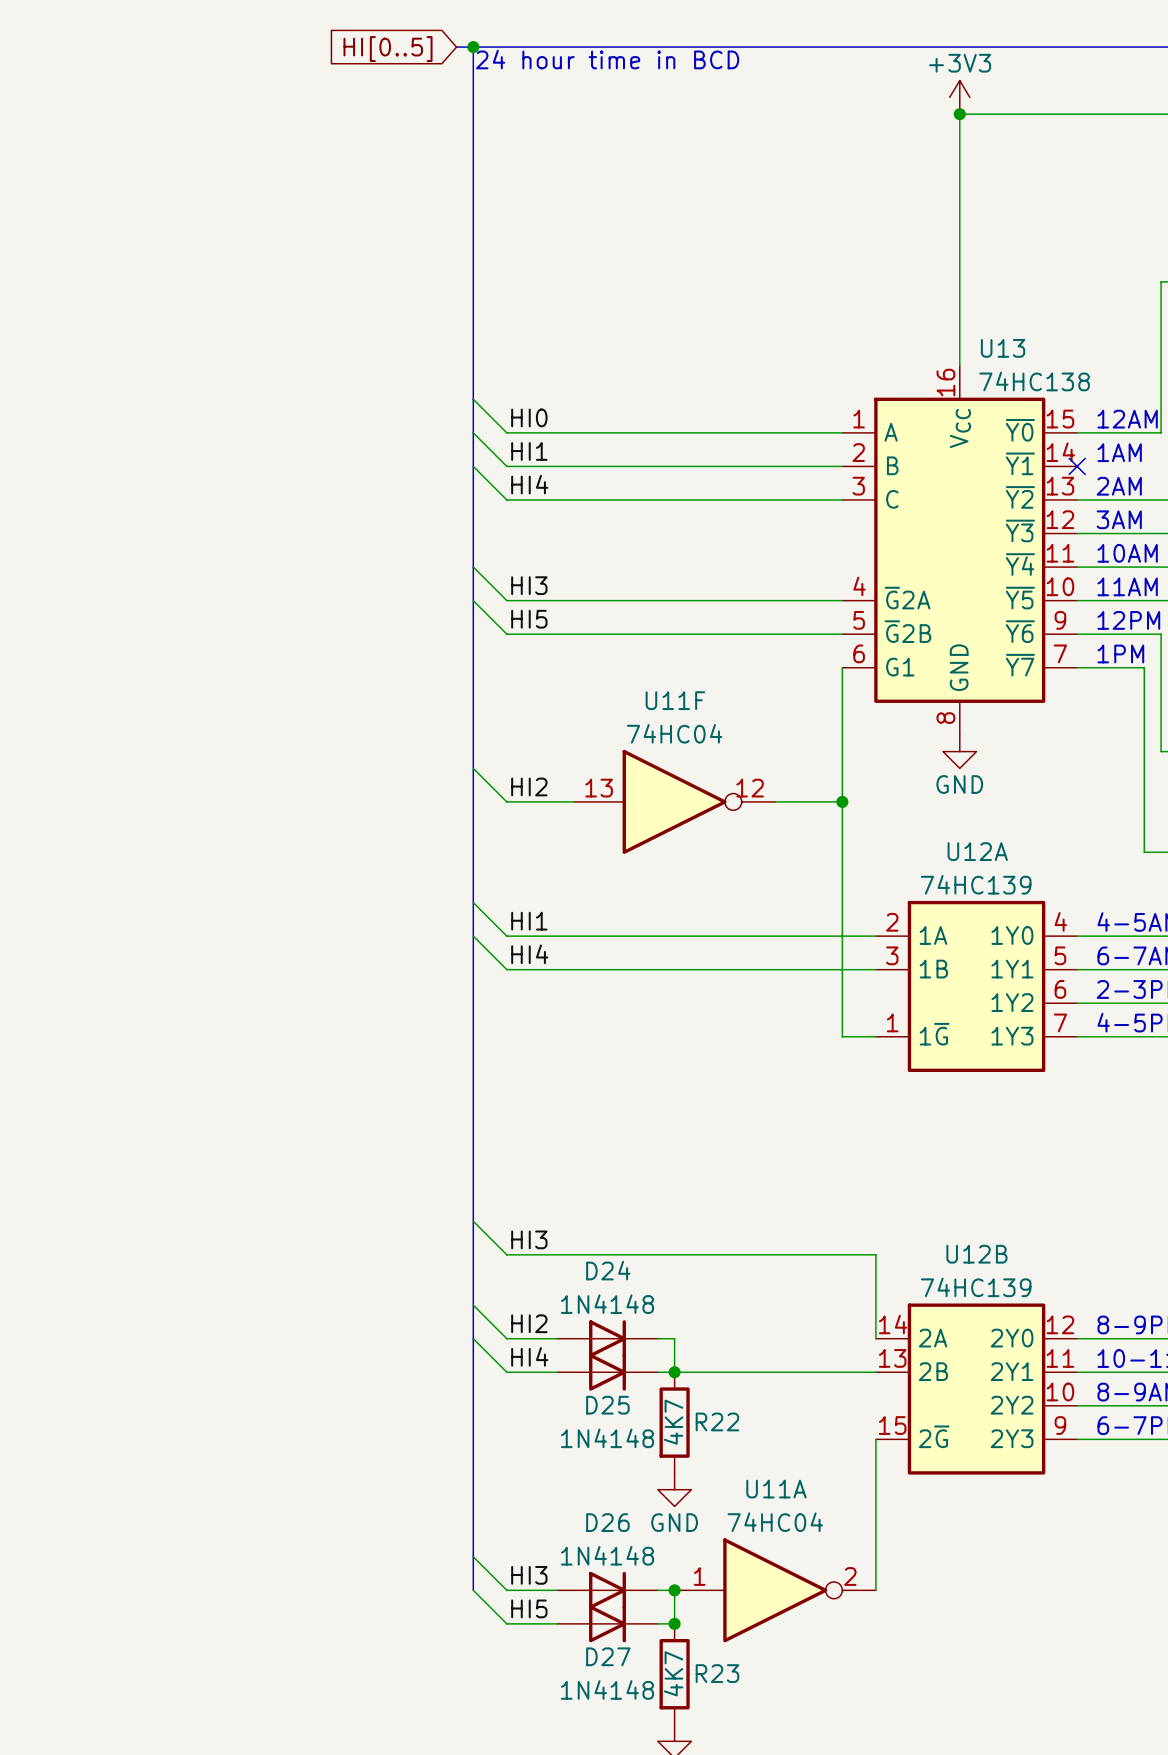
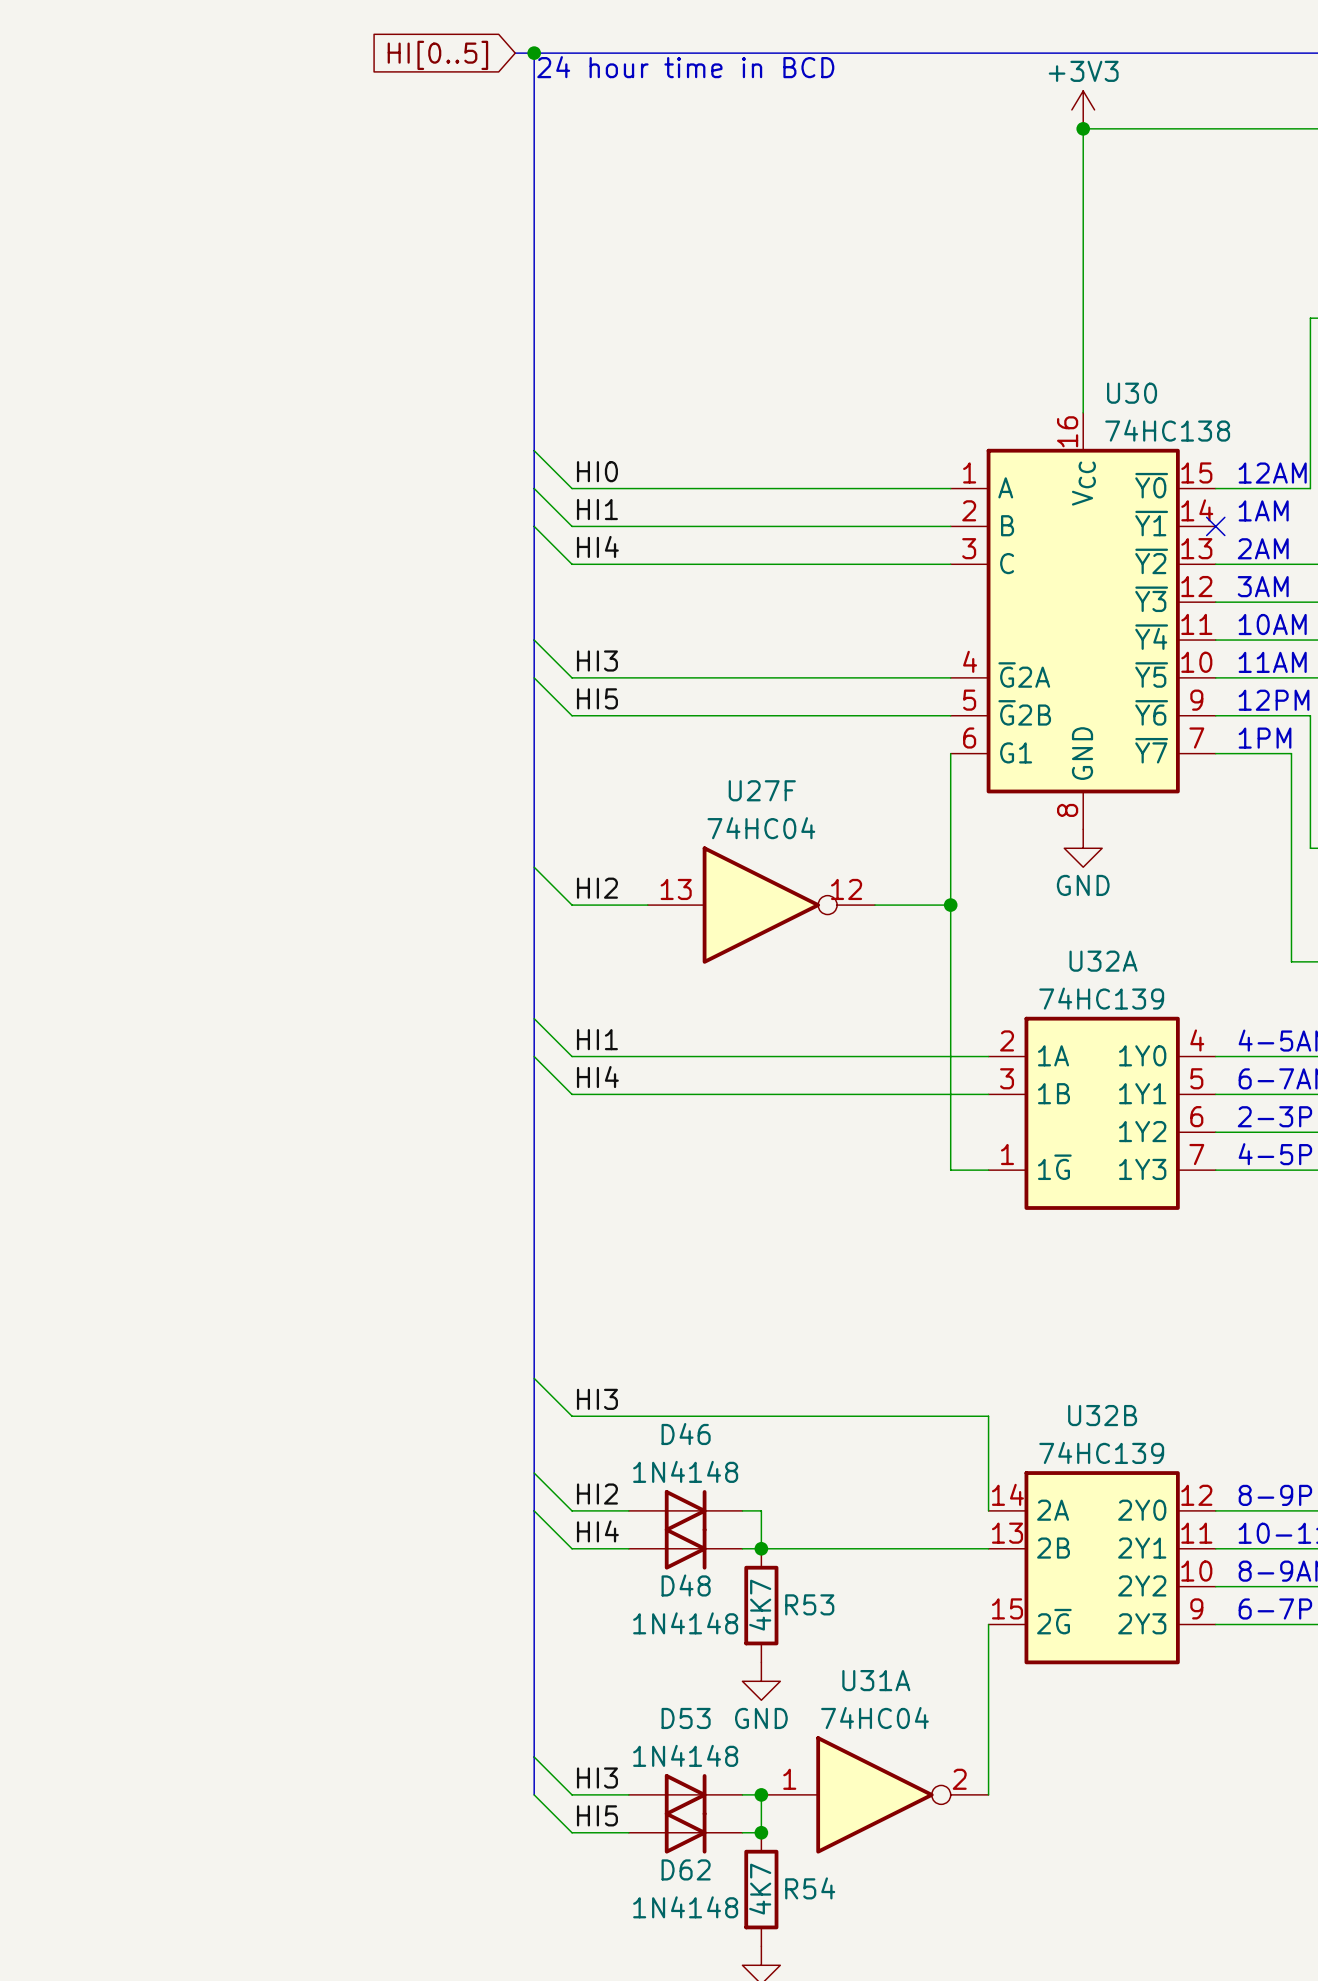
U13 name: U13 (1003, 348) -> U30 (1132, 393)
U11F name: U11F (675, 700) -> U27F (762, 790)
U12A name: U12A (977, 851) -> U32A (1103, 961)
U12B name: U12B (976, 1254) -> U32B (1102, 1415)
D24 name: D24 (608, 1270) -> D46 (686, 1434)
D25 name: D25 (607, 1405) -> D48 (686, 1585)
R22 name: R22 (717, 1421) -> R53 (809, 1604)
U11A name: U11A (776, 1489) -> U31A (876, 1680)
D26 name: D26 (607, 1522) -> D53 (686, 1718)
D27 name: D27 (608, 1656) -> D62 (686, 1869)
R23 name: R23 (717, 1673) -> R54 (810, 1888)

